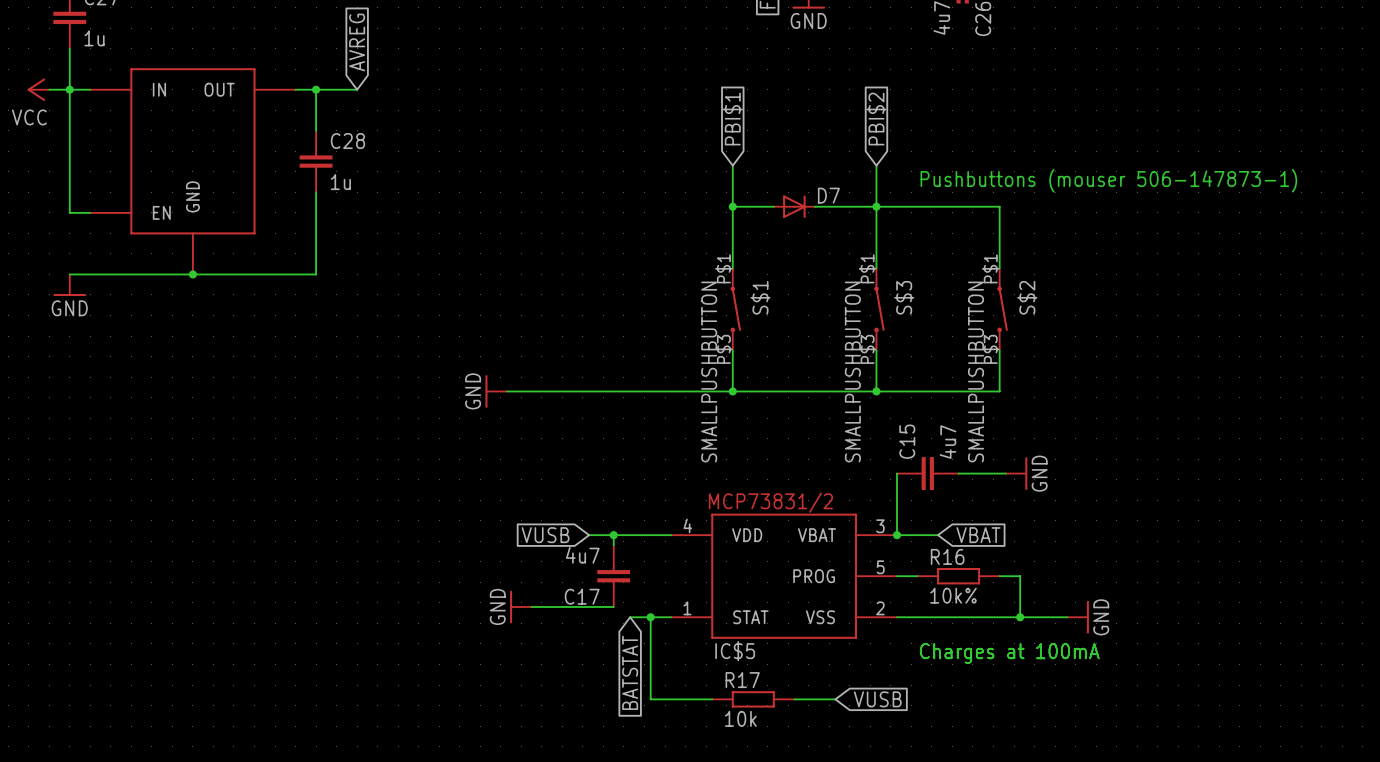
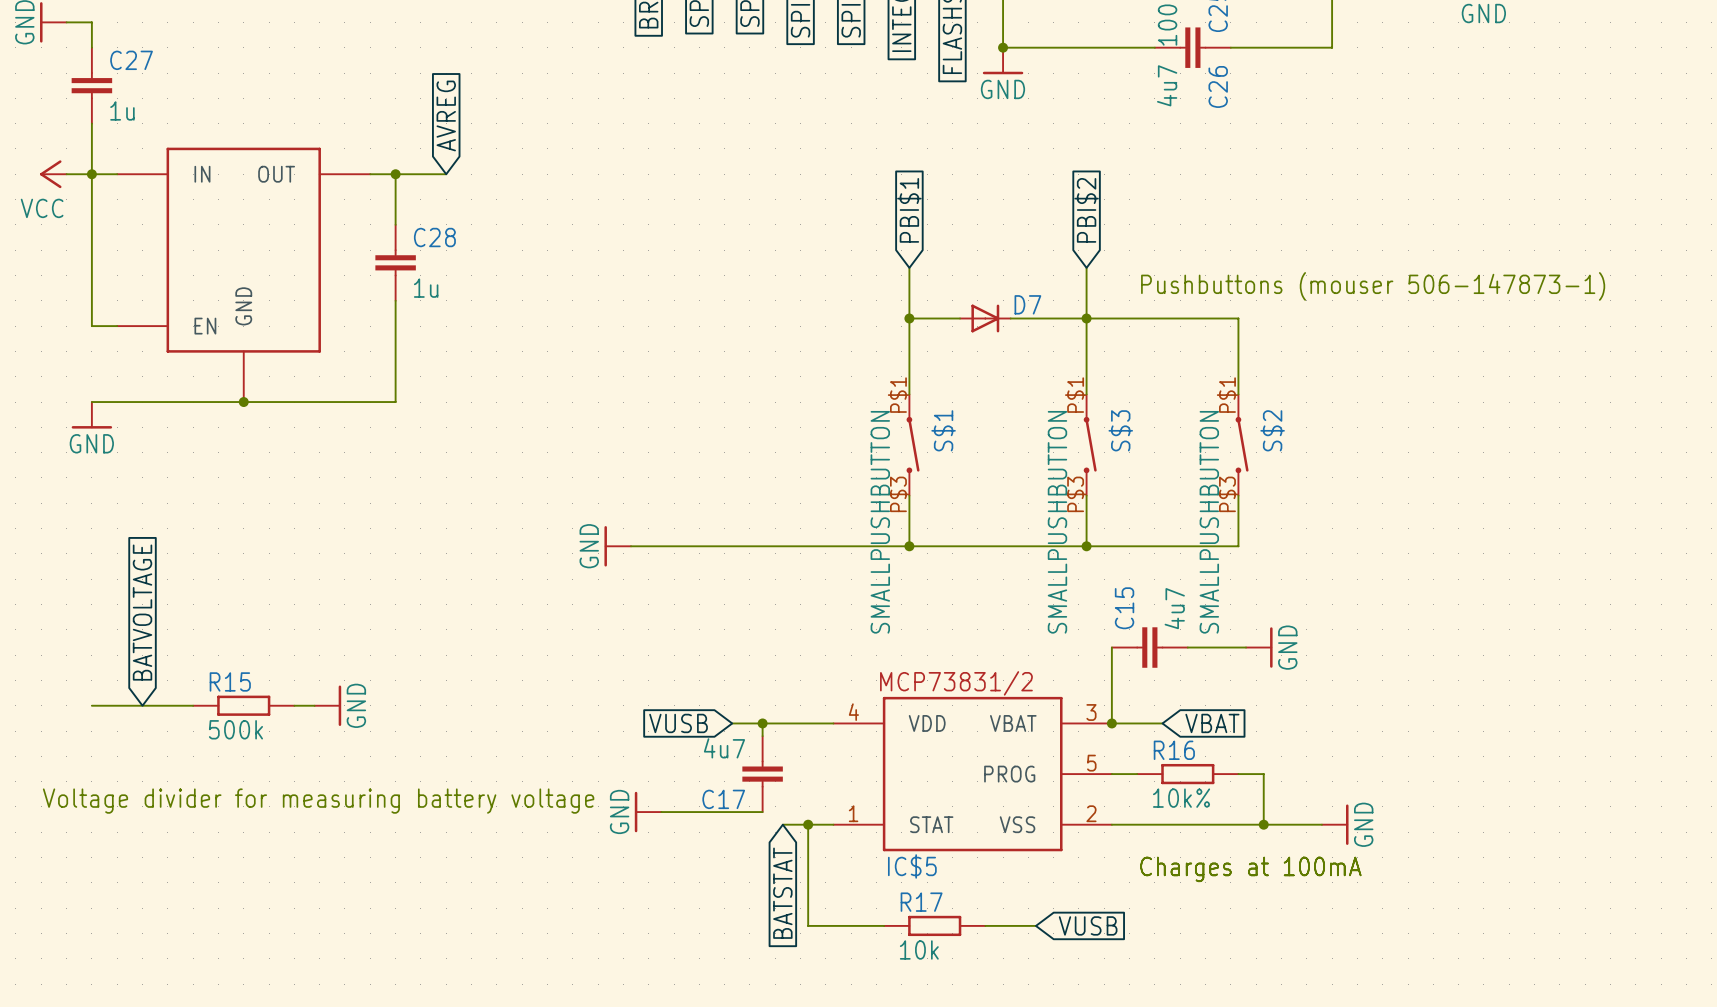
global label: none -> BATVOLTAGE (142, 612)
wire: none -> (91, 705) (193, 705)
R15: none -> 500k (243, 705)
wire: none -> (294, 705) (314, 705)
power symbol: none -> GND (327, 705)
text: none -> Voltage divider for measuring battery voltage (318, 801)

